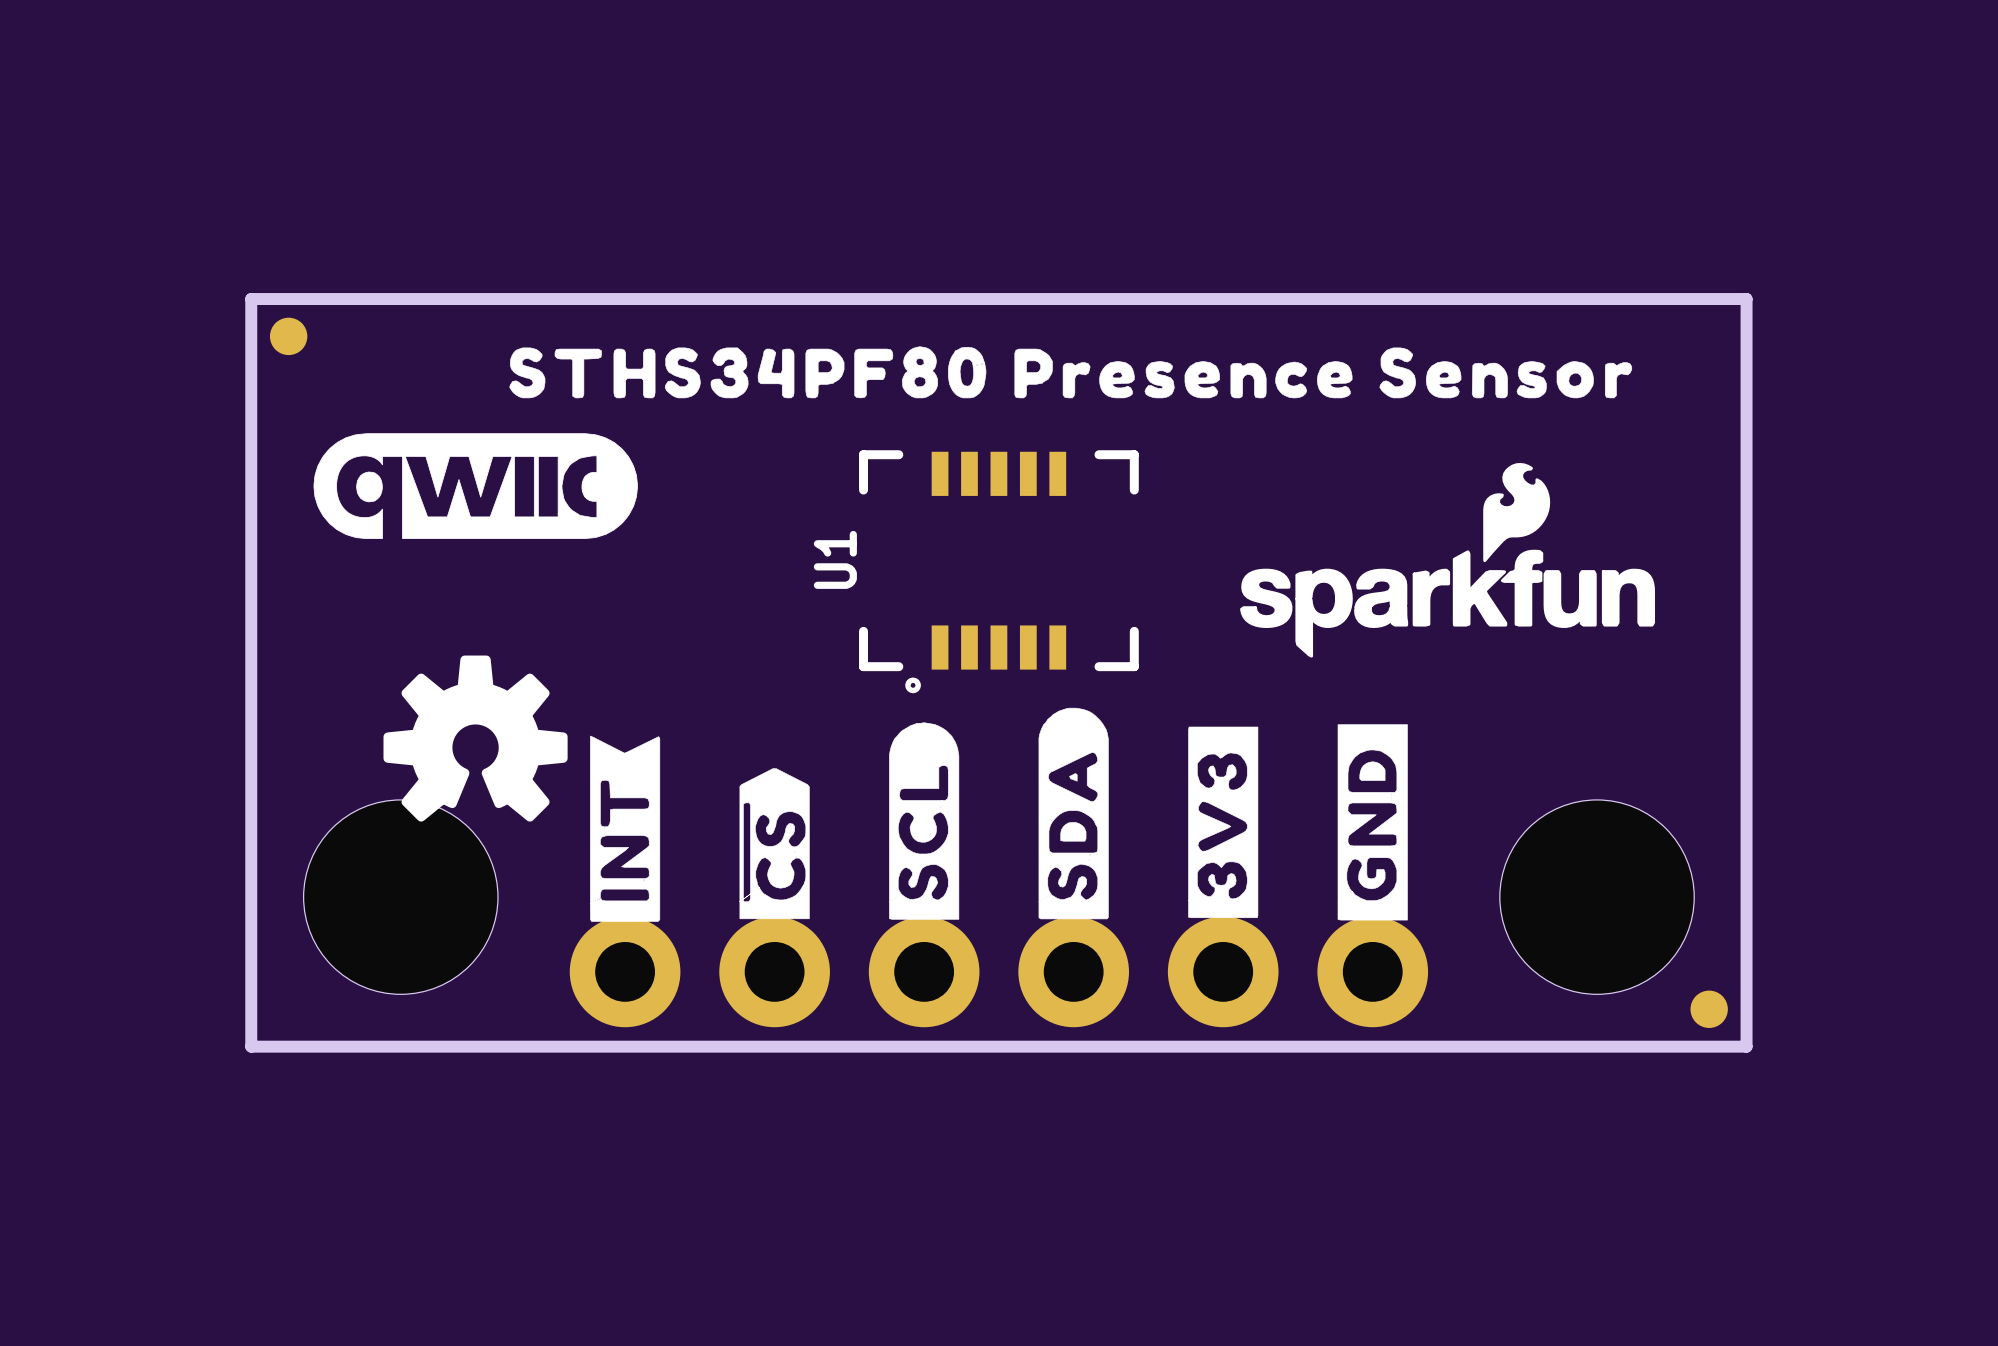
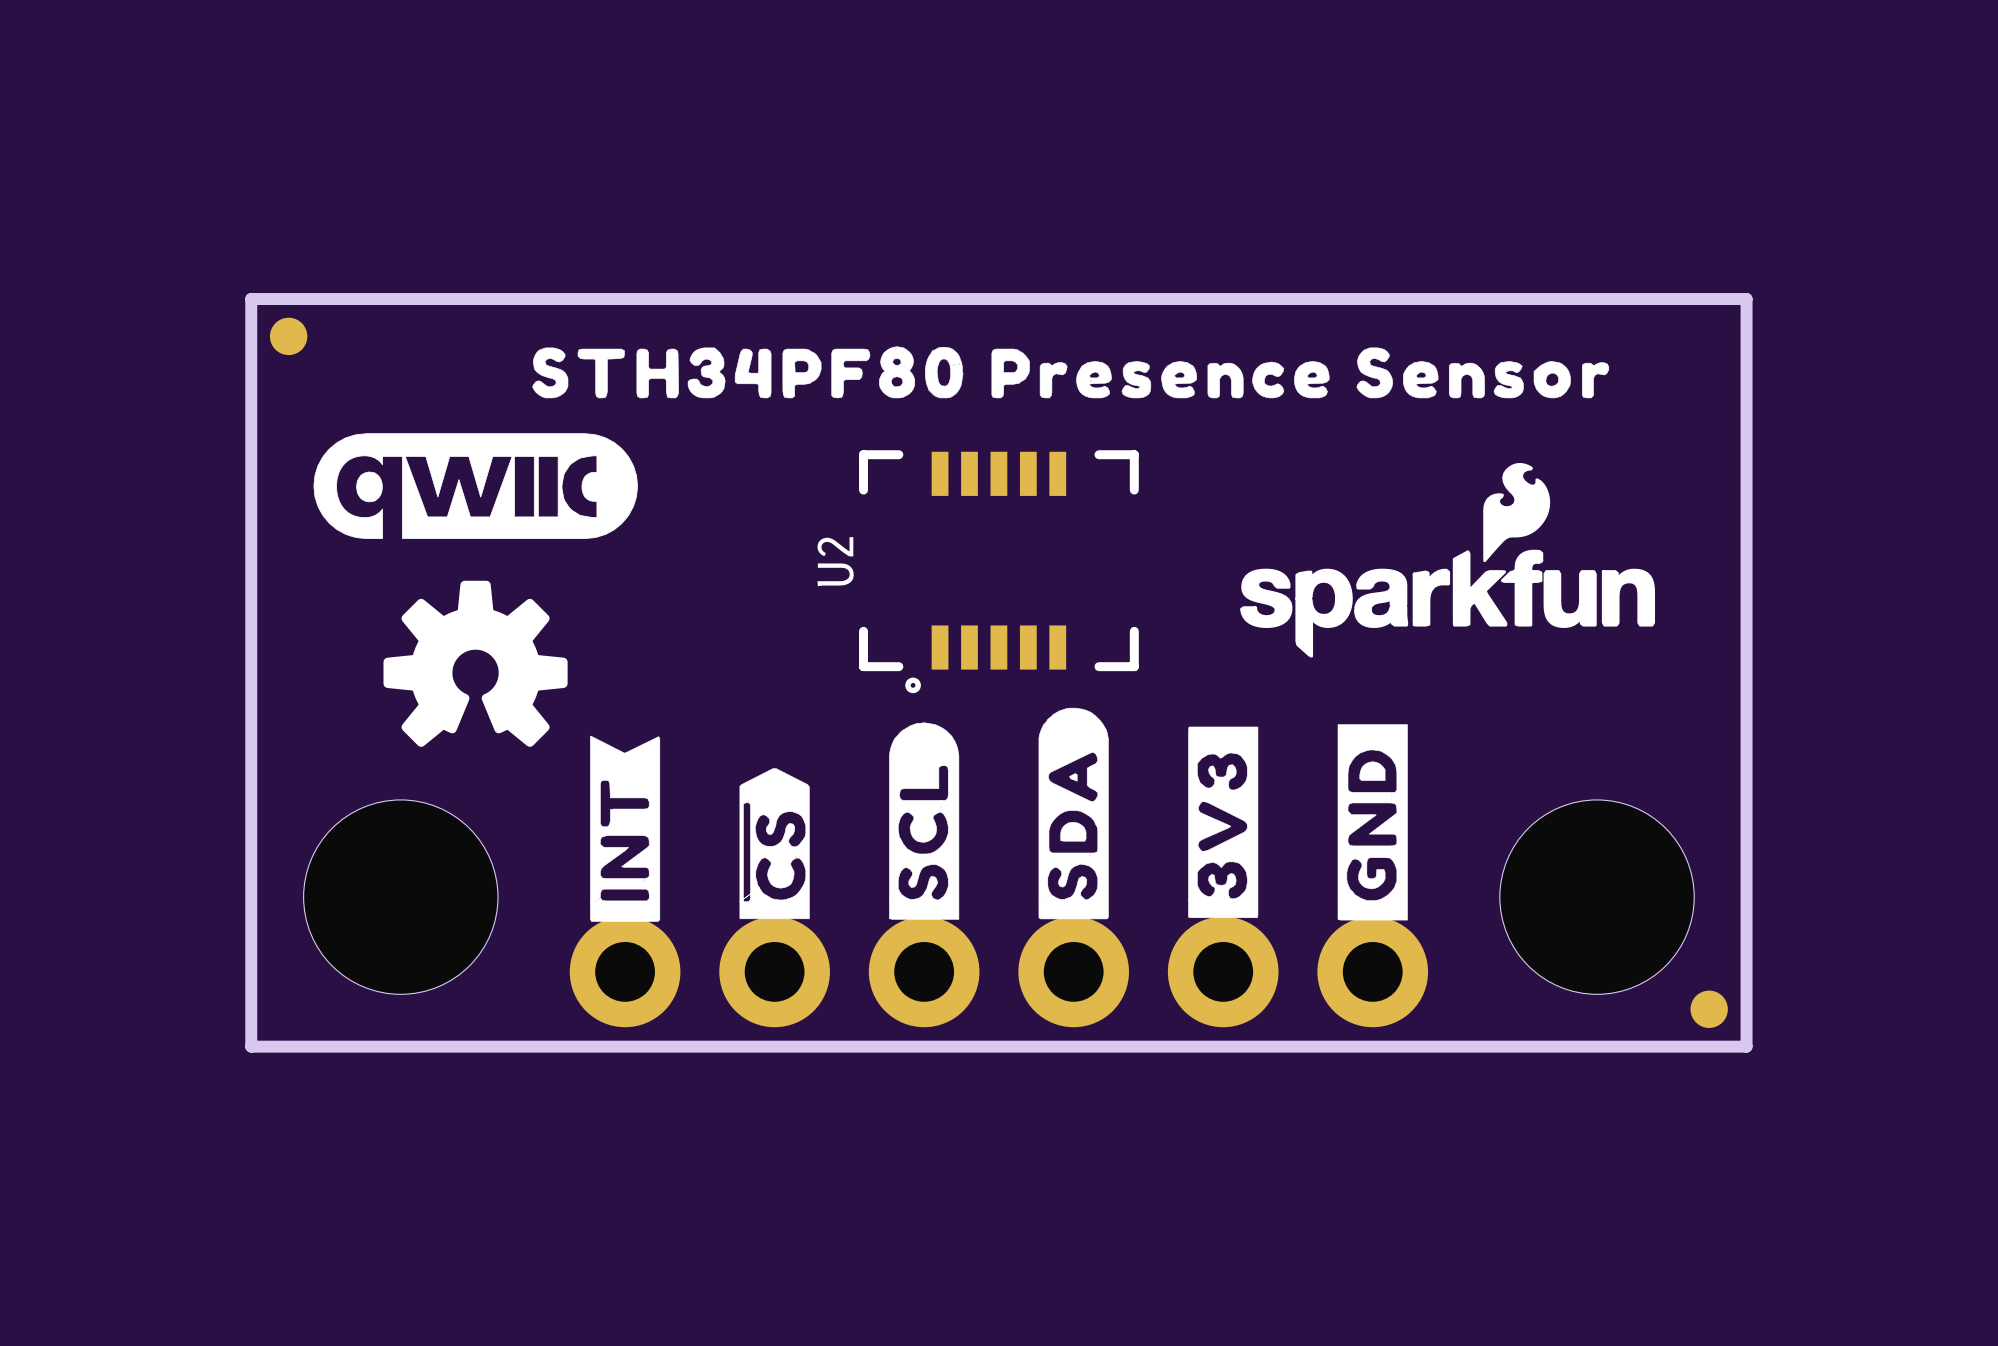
drawing shape: [509, 346, 1633, 399] -> [532, 346, 1610, 399]
U1 name: U1 (835, 559) -> U2 (835, 561)
drawing position: (475, 738) -> (475, 663)

